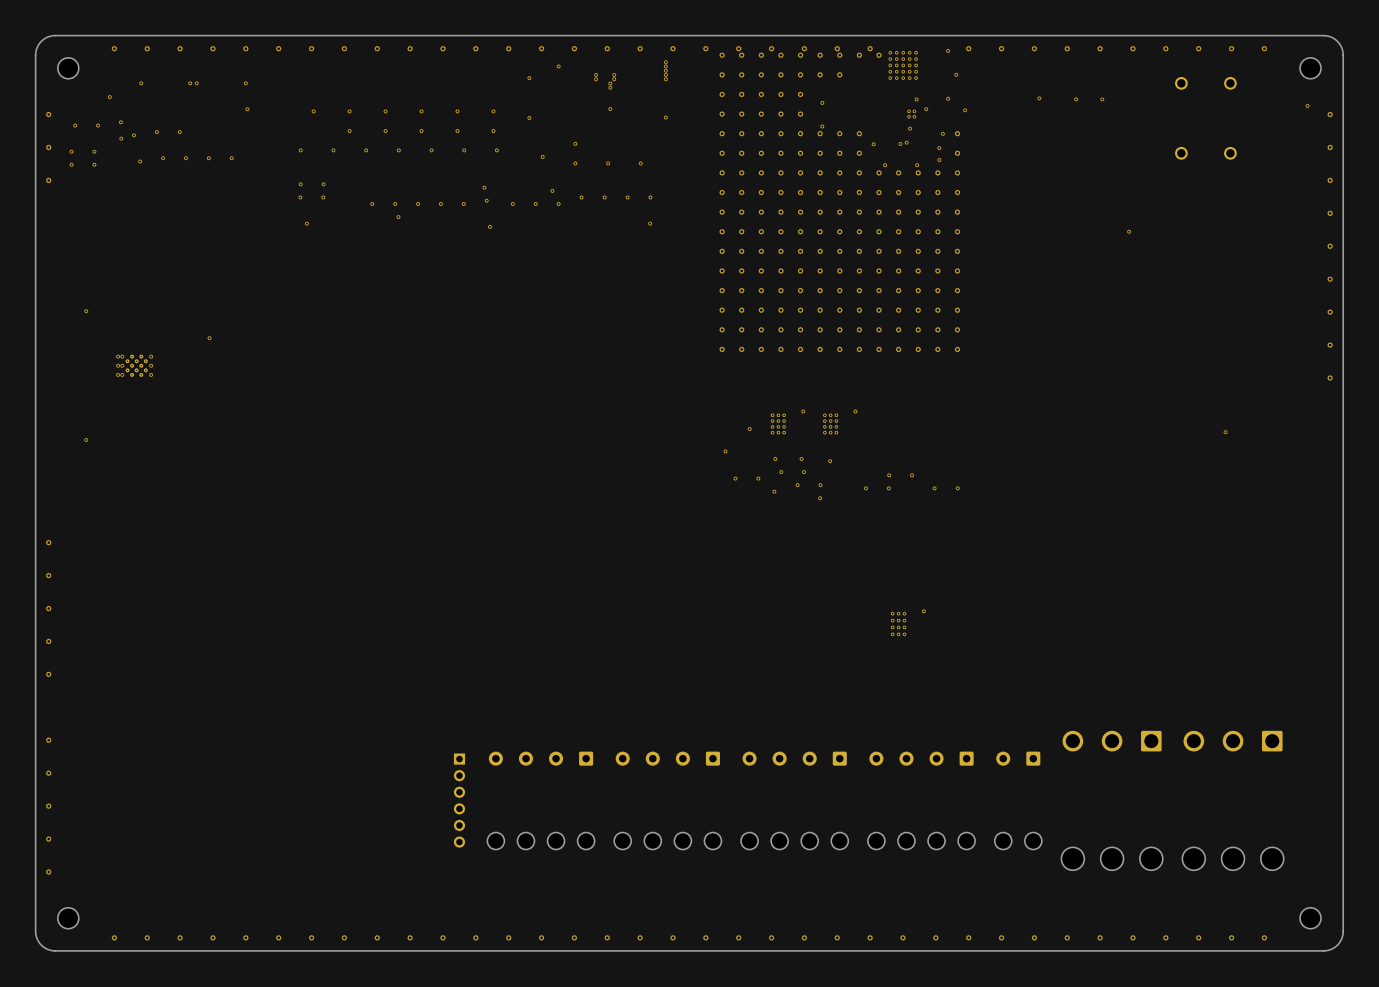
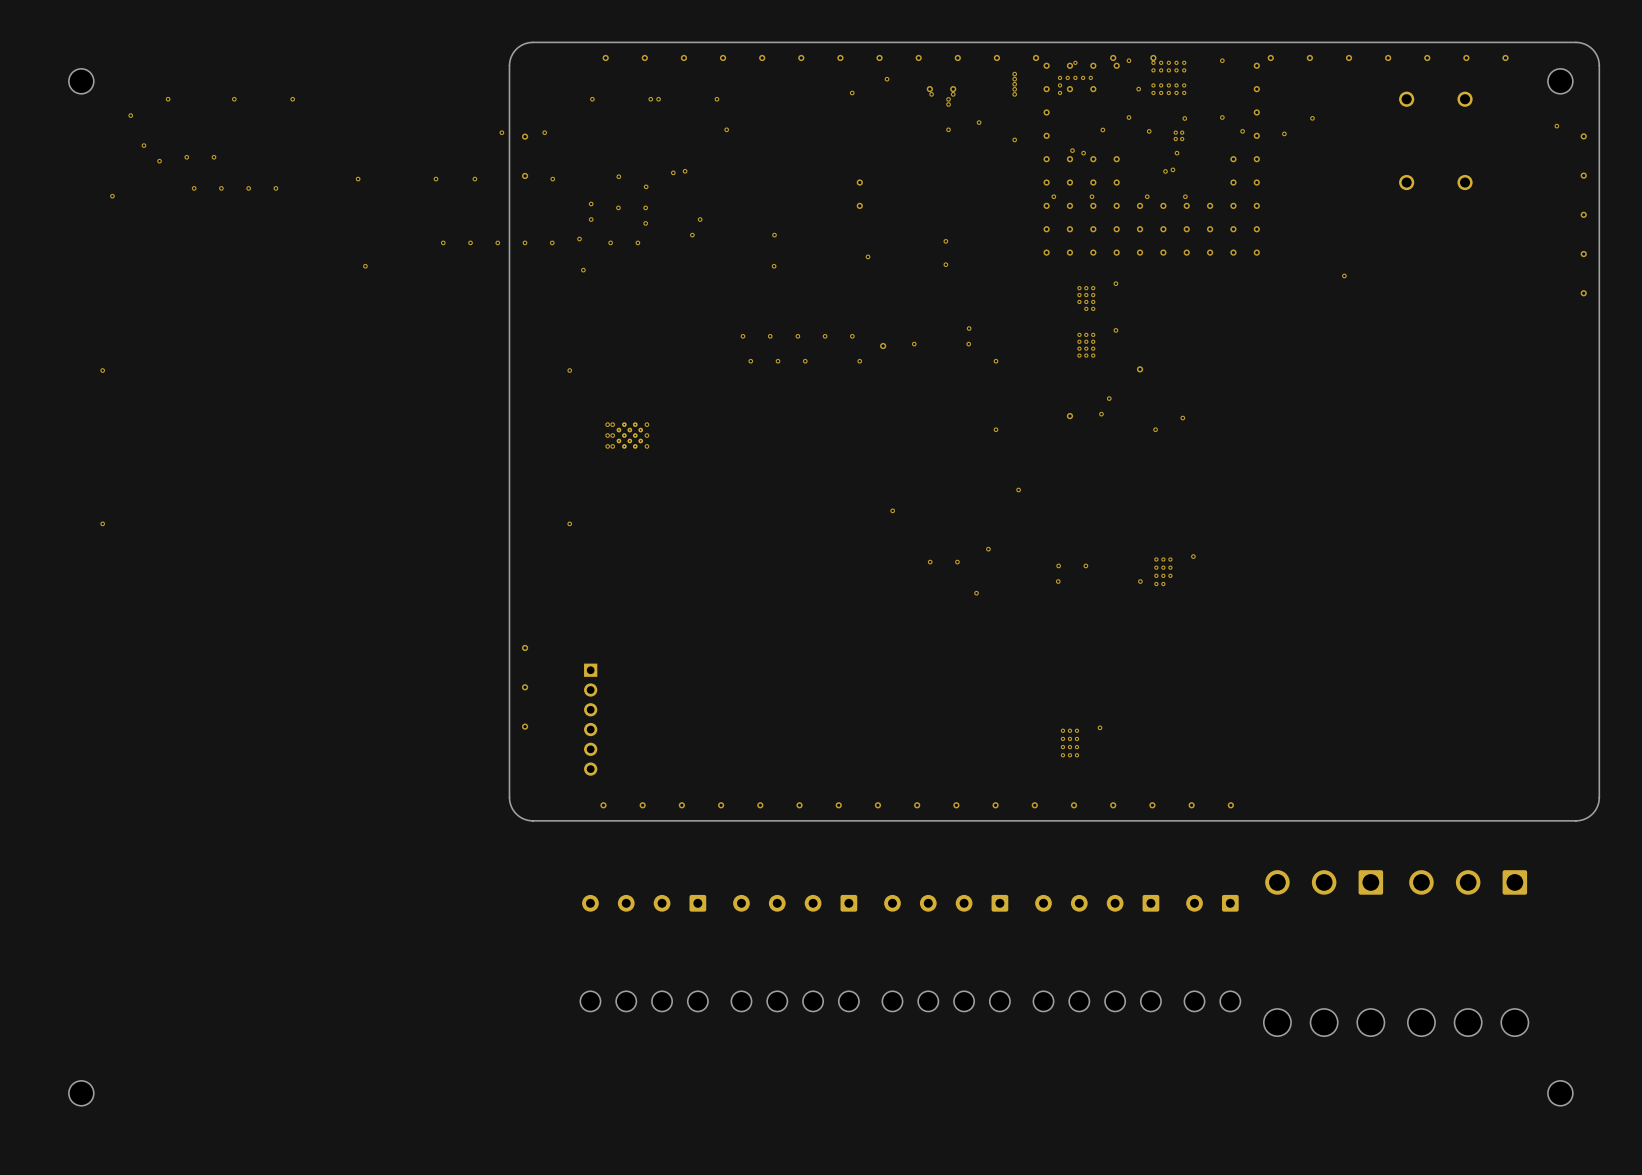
board edge: (447, 35) (55, 35) (43, 39) (37, 47) (35, 931) (38, 941) (43, 946) (55, 950) (1328, 950) (1339, 943) (1343, 931) (1343, 669) -> (532, 42) (523, 44) (516, 49) (511, 56) (509, 65) (509, 797) (511, 806) (518, 816) (532, 820) (1575, 820) (1584, 819) (1592, 814) (1597, 806) (1599, 797)
via: (114, 48) -> none
via: (147, 48) -> none
via: (180, 48) -> none
via: (212, 48) -> none
via: (245, 48) -> none
via: (278, 48) -> none
via: (311, 48) -> none
via: (344, 48) -> none
via: (377, 48) -> none
via: (410, 48) -> none
via: (442, 48) -> none
via: (475, 48) -> none
via: none -> (1113, 57)
via: (1001, 48) -> none
via: (1034, 48) -> none
via: none -> (1222, 60)
via: (890, 52) -> none
via: (896, 52) -> none
via: (909, 52) -> none
via: (916, 52) -> none
via: none -> (1153, 62)
via: none -> (1161, 62)
via: none -> (1168, 62)
via: none -> (1176, 62)
via: none -> (1184, 62)
via: (722, 55) -> none
via: (741, 55) -> none
via: (761, 55) -> none
via: (780, 55) -> none
via: (800, 55) -> none
via: (820, 55) -> none
via: (839, 55) -> none
via: (859, 55) -> none
via: none -> (1069, 65)
via: none -> (1093, 65)
via: none -> (1116, 65)
via: none -> (1256, 65)
via: (890, 59) -> none
via: (896, 59) -> none
via: (903, 59) -> none
via: (909, 59) -> none
via: (916, 59) -> none
via: none -> (1153, 70)
via: none -> (1161, 70)
via: none -> (1168, 70)
via: none -> (1176, 70)
via: none -> (1184, 70)
via: (665, 62) -> none
via: none -> (1014, 74)
via: (558, 66) -> none
via: (665, 66) -> none
via: none -> (887, 79)
via: none -> (1014, 79)
via: (665, 70) -> none
via: none -> (1014, 84)
via: (896, 71) -> none
via: (903, 71) -> none
via: (909, 71) -> none
via: (916, 71) -> none
via: none -> (1153, 85)
via: none -> (1161, 85)
via: none -> (1168, 85)
via: none -> (1176, 85)
via: none -> (1184, 85)
via: (722, 74) -> none
via: (741, 74) -> none
via: (761, 74) -> none
via: (820, 74) -> none
via: (839, 74) -> none
via: none -> (1046, 89)
via: none -> (1069, 89)
via: none -> (1093, 89)
via: none -> (1256, 89)
via: (596, 75) -> none
via: (614, 75) -> none
via: (665, 75) -> none
via: none -> (1014, 89)
via: (529, 78) -> none
via: none -> (852, 93)
via: (896, 78) -> none
via: (903, 78) -> none
via: (909, 78) -> none
via: (916, 78) -> none
via: none -> (1153, 92)
via: none -> (1161, 92)
via: none -> (1168, 92)
via: none -> (1176, 92)
via: none -> (1184, 92)
via: (596, 79) -> none
via: (614, 79) -> none
via: (665, 79) -> none
via: none -> (931, 94)
via: none -> (953, 94)
via: none -> (1014, 94)
via: (190, 83) -> none
via: none -> (592, 99)
via: none -> (650, 99)
via: none -> (658, 99)
via: none -> (716, 99)
via: (610, 83) -> none
via: none -> (948, 99)
via: (610, 87) -> none
via: none -> (948, 104)
via: (722, 94) -> none
via: (741, 94) -> none
via: (761, 94) -> none
via: (780, 94) -> none
via: (800, 94) -> none
via: none -> (1046, 112)
via: none -> (1256, 112)
via: none -> (1222, 117)
via: (1039, 98) -> none
via: (916, 99) -> none
via: none -> (1184, 118)
via position: (1076, 99) -> (1284, 133)
via: (247, 109) -> none
via: none -> (948, 129)
via: none -> (1242, 131)
via: (313, 111) -> none
via: (349, 111) -> none
via: (385, 111) -> none
via: (493, 111) -> none
via: (909, 111) -> none
via: (914, 111) -> none
via: none -> (1175, 132)
via: none -> (1182, 132)
via: (48, 114) -> none
via: none -> (525, 136)
via: (722, 114) -> none
via: (741, 114) -> none
via: (761, 114) -> none
via: (780, 114) -> none
via: (800, 114) -> none
via: none -> (1046, 135)
via: none -> (1256, 135)
via: (909, 116) -> none
via: (914, 116) -> none
via: none -> (1175, 139)
via: none -> (1182, 139)
via: (529, 117) -> none
via: (665, 117) -> none
via: none -> (1014, 139)
via: (75, 125) -> none
via: (98, 125) -> none
via: (822, 126) -> none
via: none -> (1072, 150)
via: none -> (1177, 153)
via: (349, 131) -> none
via: (385, 131) -> none
via: (421, 131) -> none
via: (457, 131) -> none
via: (493, 131) -> none
via: (722, 133) -> none
via: (741, 133) -> none
via: (761, 133) -> none
via: (780, 133) -> none
via: (800, 133) -> none
via: (820, 133) -> none
via: (839, 133) -> none
via: (859, 133) -> none
via: none -> (1046, 159)
via: none -> (1069, 159)
via: none -> (1093, 159)
via: none -> (1116, 159)
via: (942, 133) -> none
via: (957, 133) -> none
via: none -> (1233, 159)
via: none -> (1256, 159)
via: (121, 138) -> none
via: (906, 142) -> none
via: none -> (1172, 169)
via: (900, 143) -> none
via: none -> (1165, 171)
via: (873, 144) -> none
via: none -> (673, 172)
via: (48, 147) -> none
via: none -> (525, 175)
via: none -> (618, 176)
via: (939, 148) -> none
via: (333, 150) -> none
via: (431, 150) -> none
via: (496, 150) -> none
via: (71, 151) -> none
via: (94, 151) -> none
via: (741, 153) -> none
via: (761, 153) -> none
via: (780, 153) -> none
via: (800, 153) -> none
via: (820, 153) -> none
via: (839, 153) -> none
via: (859, 153) -> none
via: none -> (1046, 182)
via: none -> (1069, 182)
via: none -> (1093, 182)
via: none -> (1116, 182)
via: (957, 153) -> none
via: none -> (1233, 182)
via: none -> (1256, 182)
via: (939, 160) -> none
via: (140, 161) -> none
via: (575, 163) -> none
via: (608, 163) -> none
via: (640, 163) -> none
via: (71, 164) -> none
via: none -> (1147, 196)
via: none -> (1185, 196)
via: none -> (591, 203)
via: (741, 172) -> none
via: (761, 172) -> none
via: (780, 172) -> none
via: (800, 172) -> none
via: (820, 172) -> none
via: (839, 172) -> none
via: (859, 172) -> none
via: none -> (1163, 205)
via: none -> (1186, 205)
via: none -> (1210, 205)
via: none -> (1233, 205)
via: none -> (1256, 205)
via: none -> (618, 207)
via: none -> (645, 207)
via: (48, 180) -> none
via: (300, 184) -> none
via: (323, 184) -> none
via: none -> (591, 219)
via: none -> (700, 219)
via: (484, 187) -> none
via: none -> (645, 223)
via: (552, 190) -> none
via: (722, 192) -> none
via: (741, 192) -> none
via: (761, 192) -> none
via: (780, 192) -> none
via: (800, 192) -> none
via: (820, 192) -> none
via: (839, 192) -> none
via: (859, 192) -> none
via: none -> (1163, 229)
via: none -> (1186, 229)
via: none -> (1210, 229)
via: none -> (1233, 229)
via: none -> (1256, 229)
via: (300, 197) -> none
via: (323, 197) -> none
via: (604, 197) -> none
via: (627, 197) -> none
via: none -> (945, 241)
via: (558, 204) -> none
via: (722, 212) -> none
via: (741, 212) -> none
via: (761, 212) -> none
via: (780, 212) -> none
via: (800, 212) -> none
via: (820, 212) -> none
via: (839, 212) -> none
via: (859, 212) -> none
via: none -> (1163, 252)
via: none -> (1186, 252)
via: none -> (1210, 252)
via: none -> (1233, 252)
via: none -> (1256, 252)
via: none -> (868, 256)
via: (398, 217) -> none
via: none -> (945, 264)
via: (722, 231) -> none
via: (741, 231) -> none
via: (761, 231) -> none
via: (780, 231) -> none
via: (800, 231) -> none
via: (820, 231) -> none
via: (839, 231) -> none
via: (859, 231) -> none
via: (879, 231) -> none
via: (898, 231) -> none
via: (918, 231) -> none
via: (937, 231) -> none
via: (957, 231) -> none
via: none -> (1115, 283)
via: none -> (1079, 288)
via: none -> (1086, 288)
via: none -> (1093, 288)
via: none -> (1079, 295)
via: none -> (1086, 295)
via: none -> (1093, 295)
via: (722, 251) -> none
via: (741, 251) -> none
via: (761, 251) -> none
via: (780, 251) -> none
via: (800, 251) -> none
via: (820, 251) -> none
via: (839, 251) -> none
via: (859, 251) -> none
via: (879, 251) -> none
via: (898, 251) -> none
via: (918, 251) -> none
via: (937, 251) -> none
via: (957, 251) -> none
via: none -> (1079, 301)
via: none -> (1086, 301)
via: none -> (1093, 301)
via: none -> (1086, 308)
via: none -> (1093, 308)
via: (722, 270) -> none
via: (741, 270) -> none
via: (761, 270) -> none
via: (780, 270) -> none
via: (800, 270) -> none
via: (820, 270) -> none
via: (839, 270) -> none
via: (859, 270) -> none
via: (879, 270) -> none
via: (898, 270) -> none
via: (918, 270) -> none
via: (937, 270) -> none
via: (957, 270) -> none
via: none -> (969, 328)
via: none -> (1115, 330)
via: (1330, 279) -> none
via: none -> (1079, 334)
via: none -> (1086, 334)
via: none -> (1093, 334)
via: none -> (742, 336)
via: none -> (770, 336)
via: none -> (797, 336)
via: none -> (825, 336)
via: none -> (852, 336)
via: none -> (1079, 341)
via: none -> (1086, 341)
via: none -> (1093, 341)
via: none -> (914, 344)
via: none -> (968, 344)
via: (722, 290) -> none
via: (761, 290) -> none
via: (780, 290) -> none
via: (800, 290) -> none
via: (820, 290) -> none
via: (839, 290) -> none
via: (859, 290) -> none
via: (879, 290) -> none
via: (898, 290) -> none
via: (918, 290) -> none
via: (937, 290) -> none
via: (957, 290) -> none
via: none -> (1079, 348)
via: none -> (1086, 348)
via: none -> (1093, 348)
via: none -> (1079, 355)
via: none -> (1086, 355)
via: none -> (1093, 355)
via: none -> (750, 361)
via: none -> (778, 361)
via: none -> (805, 361)
via: none -> (859, 361)
via: none -> (995, 361)
via: (722, 310) -> none
via: (741, 310) -> none
via: (761, 310) -> none
via: (780, 310) -> none
via: (800, 310) -> none
via: (820, 310) -> none
via: (839, 310) -> none
via: (859, 310) -> none
via: (879, 310) -> none
via: (898, 310) -> none
via: (918, 310) -> none
via: (937, 310) -> none
via: none -> (569, 370)
via: (1330, 312) -> none
via: (722, 329) -> none
via: (741, 329) -> none
via: (761, 329) -> none
via: (780, 329) -> none
via: (800, 329) -> none
via: (820, 329) -> none
via: (839, 329) -> none
via: (859, 329) -> none
via: (879, 329) -> none
via: (898, 329) -> none
via: (918, 329) -> none
via: (937, 329) -> none
via: (957, 329) -> none
via: none -> (1109, 398)
via: (209, 338) -> none
via: (1330, 345) -> none
via: none -> (1101, 414)
via: (722, 349) -> none
via: (741, 349) -> none
via: (761, 349) -> none
via: (780, 349) -> none
via: (800, 349) -> none
via: (820, 349) -> none
via: (839, 349) -> none
via: (859, 349) -> none
via: (879, 349) -> none
via: (918, 349) -> none
via: (937, 349) -> none
via: (957, 349) -> none
via: none -> (1182, 418)
via: (118, 356) -> none
via: (122, 356) -> none
via: (151, 356) -> none
via: none -> (607, 424)
via: none -> (612, 424)
via: none -> (646, 424)
via: none -> (995, 429)
via: none -> (1155, 429)
via: (118, 365) -> none
via: (122, 365) -> none
part: (136, 365) -> none
via: (151, 365) -> none
via: none -> (607, 435)
via: none -> (612, 435)
part: none -> (629, 435)
via: none -> (646, 435)
via: (118, 374) -> none
via: (122, 374) -> none
via: (151, 374) -> none
via: none -> (607, 446)
via: none -> (612, 446)
via: none -> (646, 446)
via: (1330, 378) -> none
via: (803, 411) -> none
via: (772, 415) -> none
via: (778, 415) -> none
via: (784, 415) -> none
via: (824, 415) -> none
via: (830, 415) -> none
via: (836, 415) -> none
via: (772, 421) -> none
via: (778, 421) -> none
via: (784, 421) -> none
via: (824, 421) -> none
via: (830, 421) -> none
via: (836, 421) -> none
via: (772, 426) -> none
via: (778, 426) -> none
via: (784, 426) -> none
via: (824, 426) -> none
via: (830, 426) -> none
via: (836, 426) -> none
via: (772, 432) -> none
via: (778, 432) -> none
via: (784, 432) -> none
via: (824, 432) -> none
via: (830, 432) -> none
via: (836, 432) -> none
via: (1225, 432) -> none
via: none -> (569, 523)
via: (725, 451) -> none
via: (775, 458) -> none
via: (801, 458) -> none
via: none -> (1193, 556)
via: none -> (1156, 559)
via: none -> (1163, 559)
via: none -> (1170, 559)
via: none -> (1156, 567)
via: none -> (1163, 567)
via: none -> (1170, 567)
via: (735, 478) -> none
via: (758, 478) -> none
via: none -> (1156, 575)
via: none -> (1163, 575)
via: none -> (1170, 575)
via: (797, 485) -> none
via: (820, 485) -> none
via: (865, 488) -> none
via: (934, 488) -> none
via: none -> (1156, 584)
via: none -> (1163, 584)
via: (774, 491) -> none
via: (48, 542) -> none
via: none -> (525, 647)
via: (48, 575) -> none
via: none -> (525, 687)
part: none -> (590, 719)
via: (48, 608) -> none
via: none -> (525, 726)
via: (48, 641) -> none
via: (48, 674) -> none
via: none -> (603, 805)
via: none -> (642, 805)
via: none -> (681, 805)
via: none -> (721, 805)
via: none -> (760, 805)
via: none -> (799, 805)
via: none -> (838, 805)
via: none -> (877, 805)
via: none -> (917, 805)
via: none -> (956, 805)
via: none -> (995, 805)
via: none -> (1034, 805)
via: none -> (1074, 805)
via: none -> (1113, 805)
via: none -> (1152, 805)
via: none -> (1191, 805)
via: none -> (1230, 805)
via: (48, 740) -> none
via: (48, 773) -> none
part: (459, 800) -> none
via: (48, 806) -> none
via: (48, 839) -> none
via: (48, 871) -> none
via: (114, 937) -> none
via: (147, 937) -> none
via: (180, 937) -> none
via: (212, 937) -> none
via: (245, 937) -> none
via: (278, 937) -> none
via: (311, 937) -> none
via: (344, 937) -> none
via: (377, 937) -> none
via: (410, 937) -> none
via: (442, 937) -> none
via: (475, 937) -> none
via: (508, 937) -> none
via: (541, 937) -> none
via: (574, 937) -> none
via: (607, 937) -> none
via: (640, 937) -> none
via: (672, 937) -> none
via: (705, 937) -> none
via: (738, 937) -> none
via: (771, 937) -> none
via: (804, 937) -> none
via: (837, 937) -> none
via: (870, 937) -> none
via: (902, 937) -> none
via: (935, 937) -> none
via: (968, 937) -> none
via: (1001, 937) -> none
via: (1034, 937) -> none
via: (1067, 937) -> none
via: (1100, 937) -> none
via: (1132, 937) -> none
via: (1165, 937) -> none
via: (1198, 937) -> none
via: (1231, 937) -> none
via: (1264, 937) -> none

